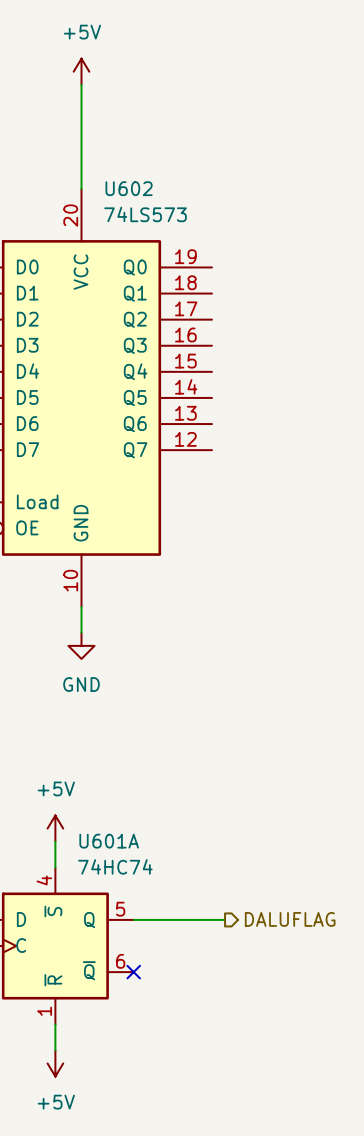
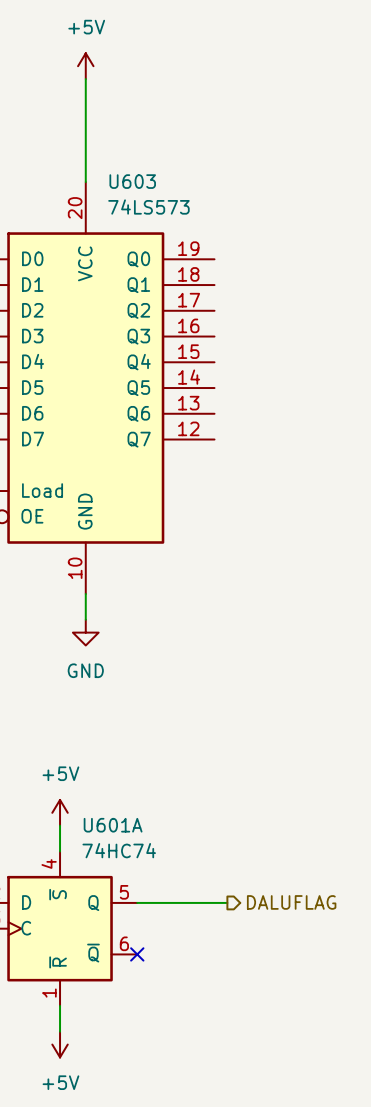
U602 name: U602 (129, 188) -> U603 (132, 181)

